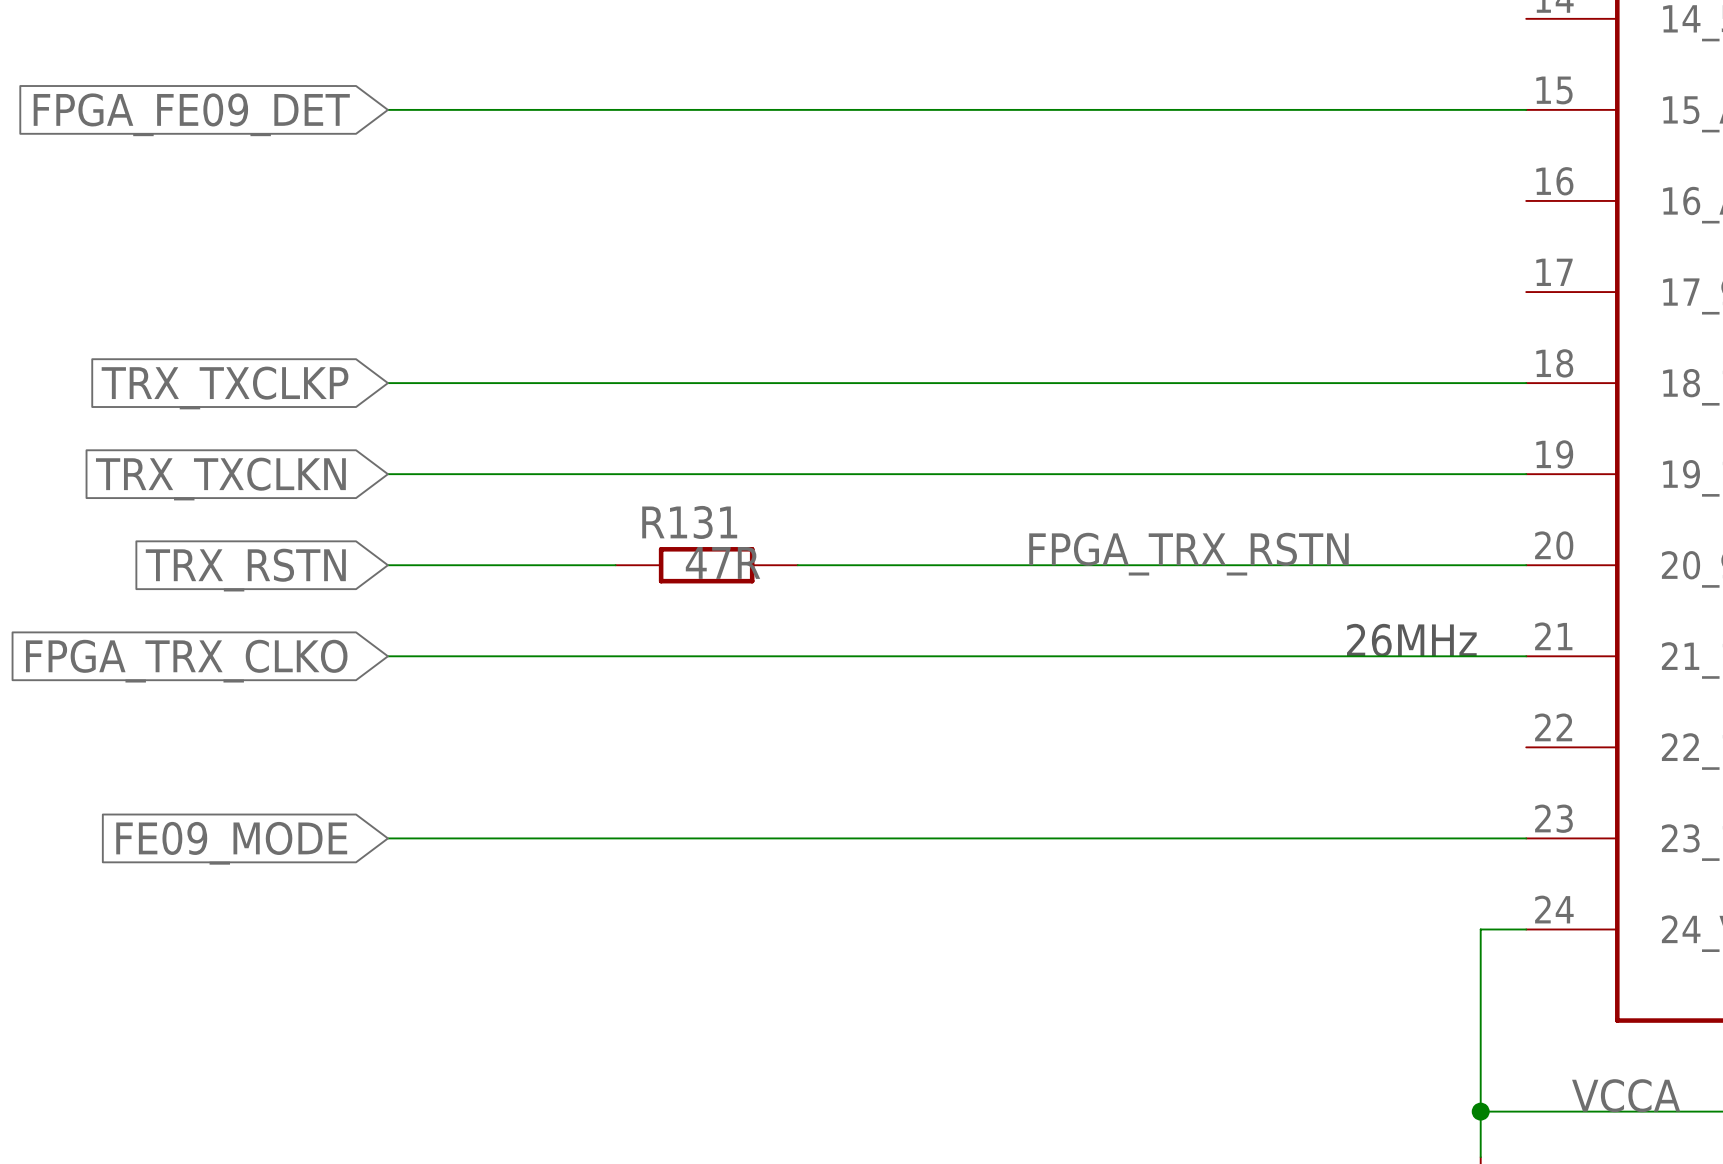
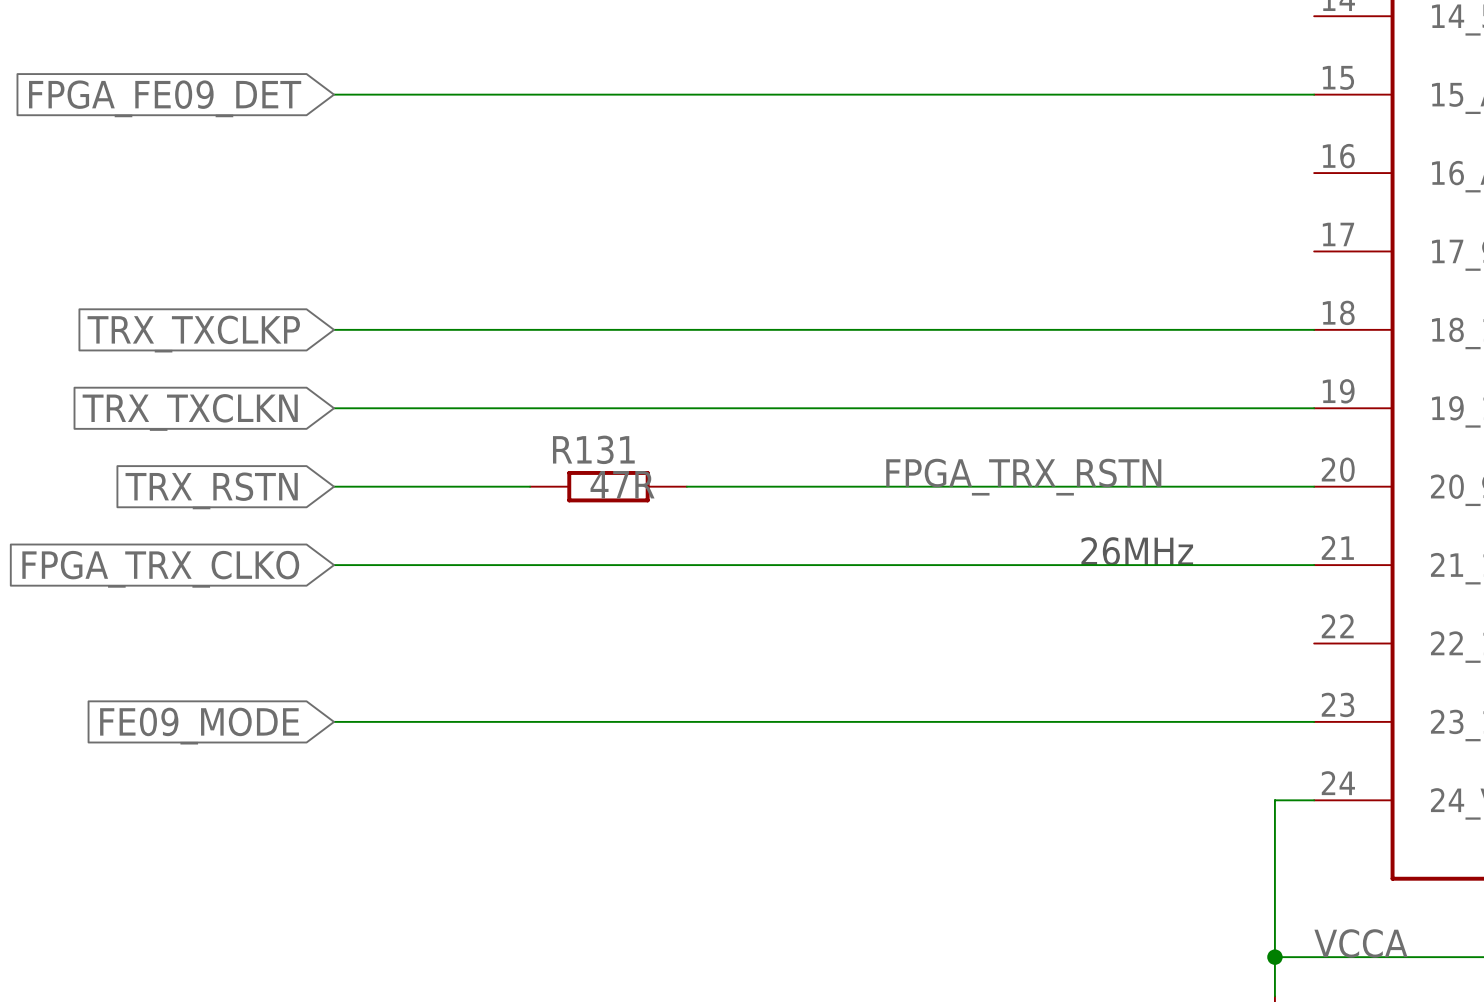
text position: 26MHz (1411, 640) -> 26MHz (1137, 551)
label position: VCCA (1626, 1095) -> VCCA (1360, 943)

